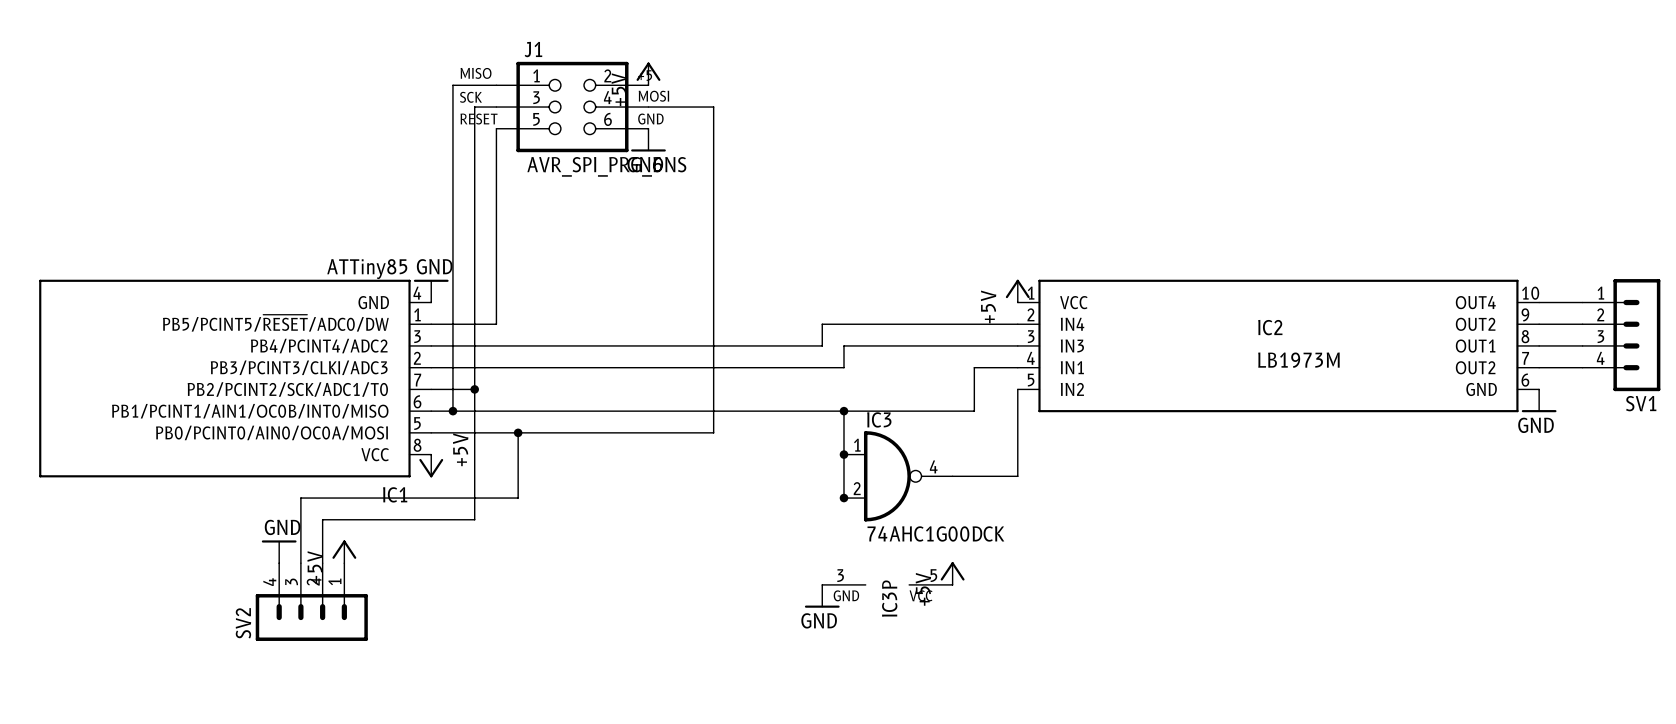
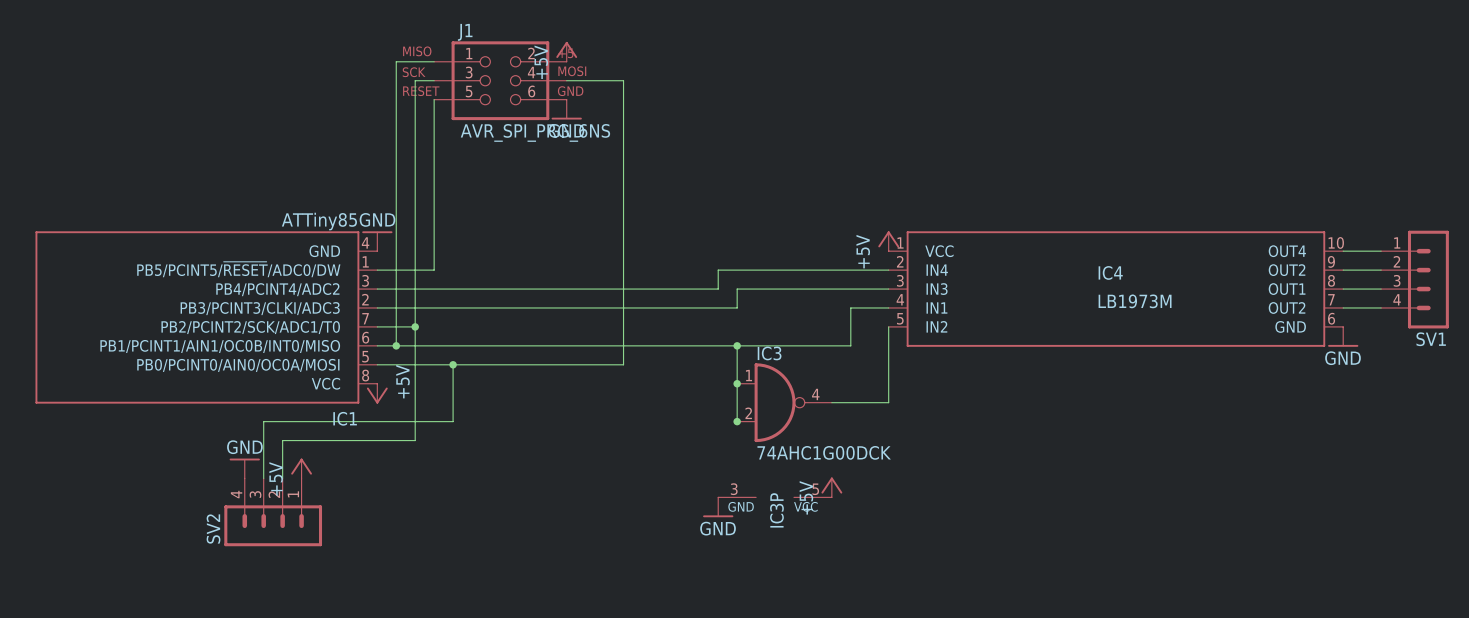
IC2 name: IC2 (1270, 327) -> IC4 (1110, 272)

